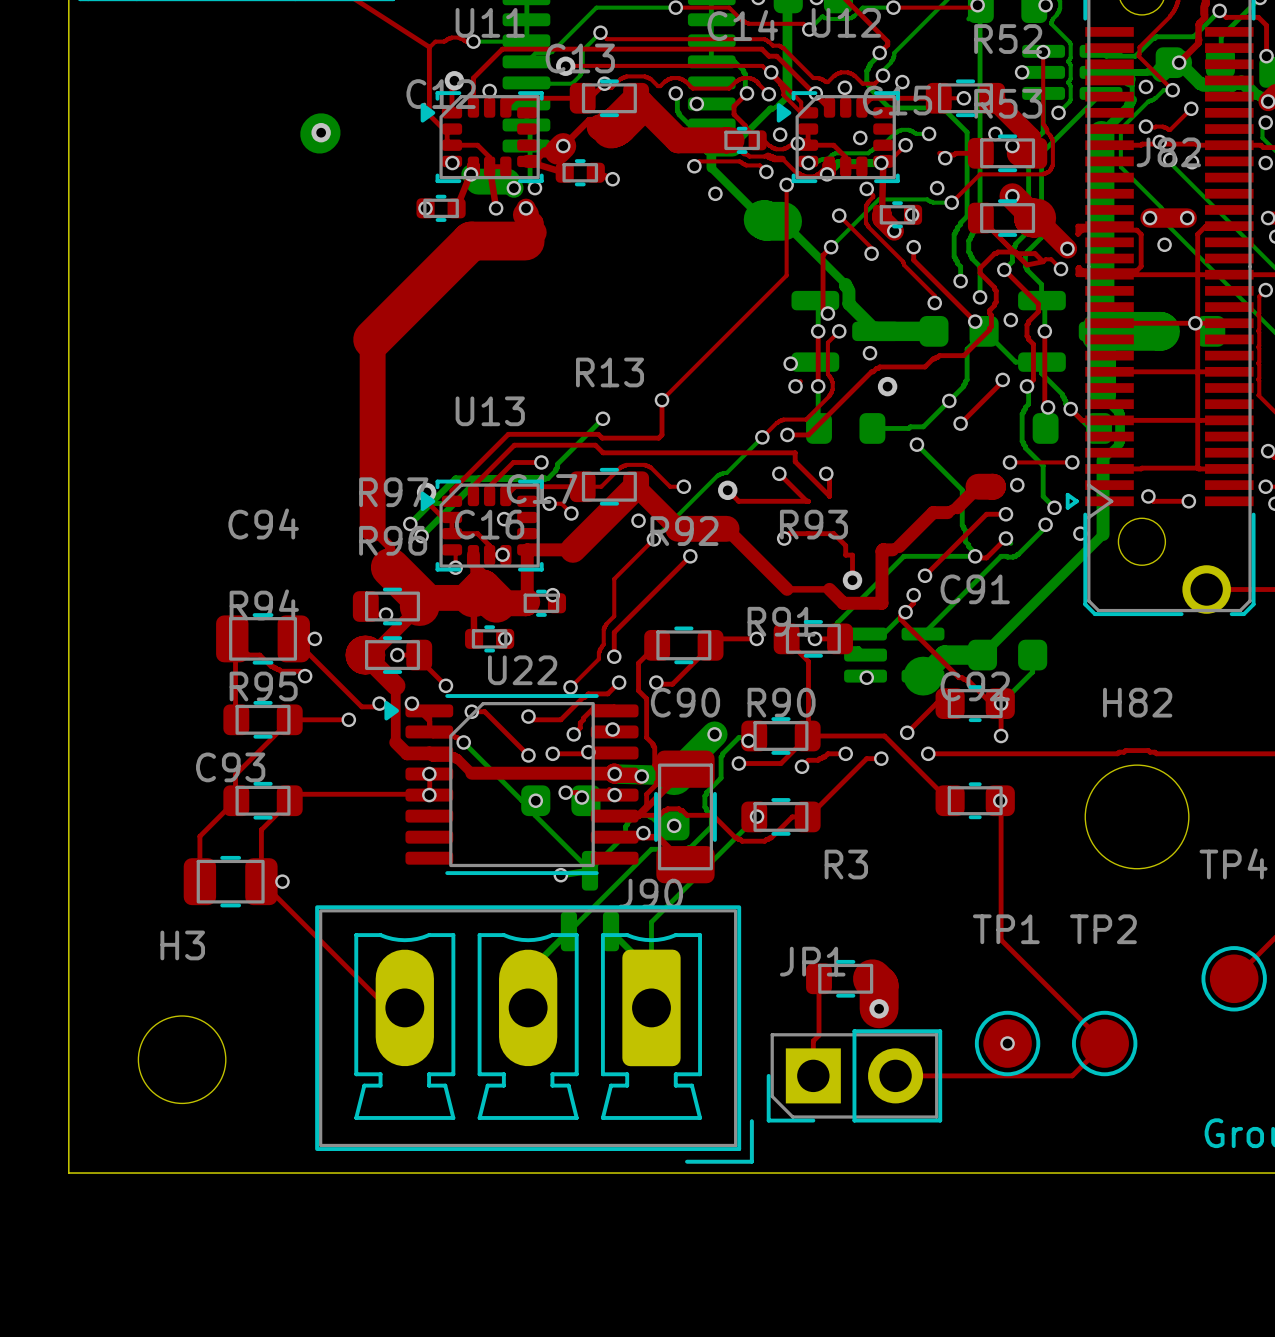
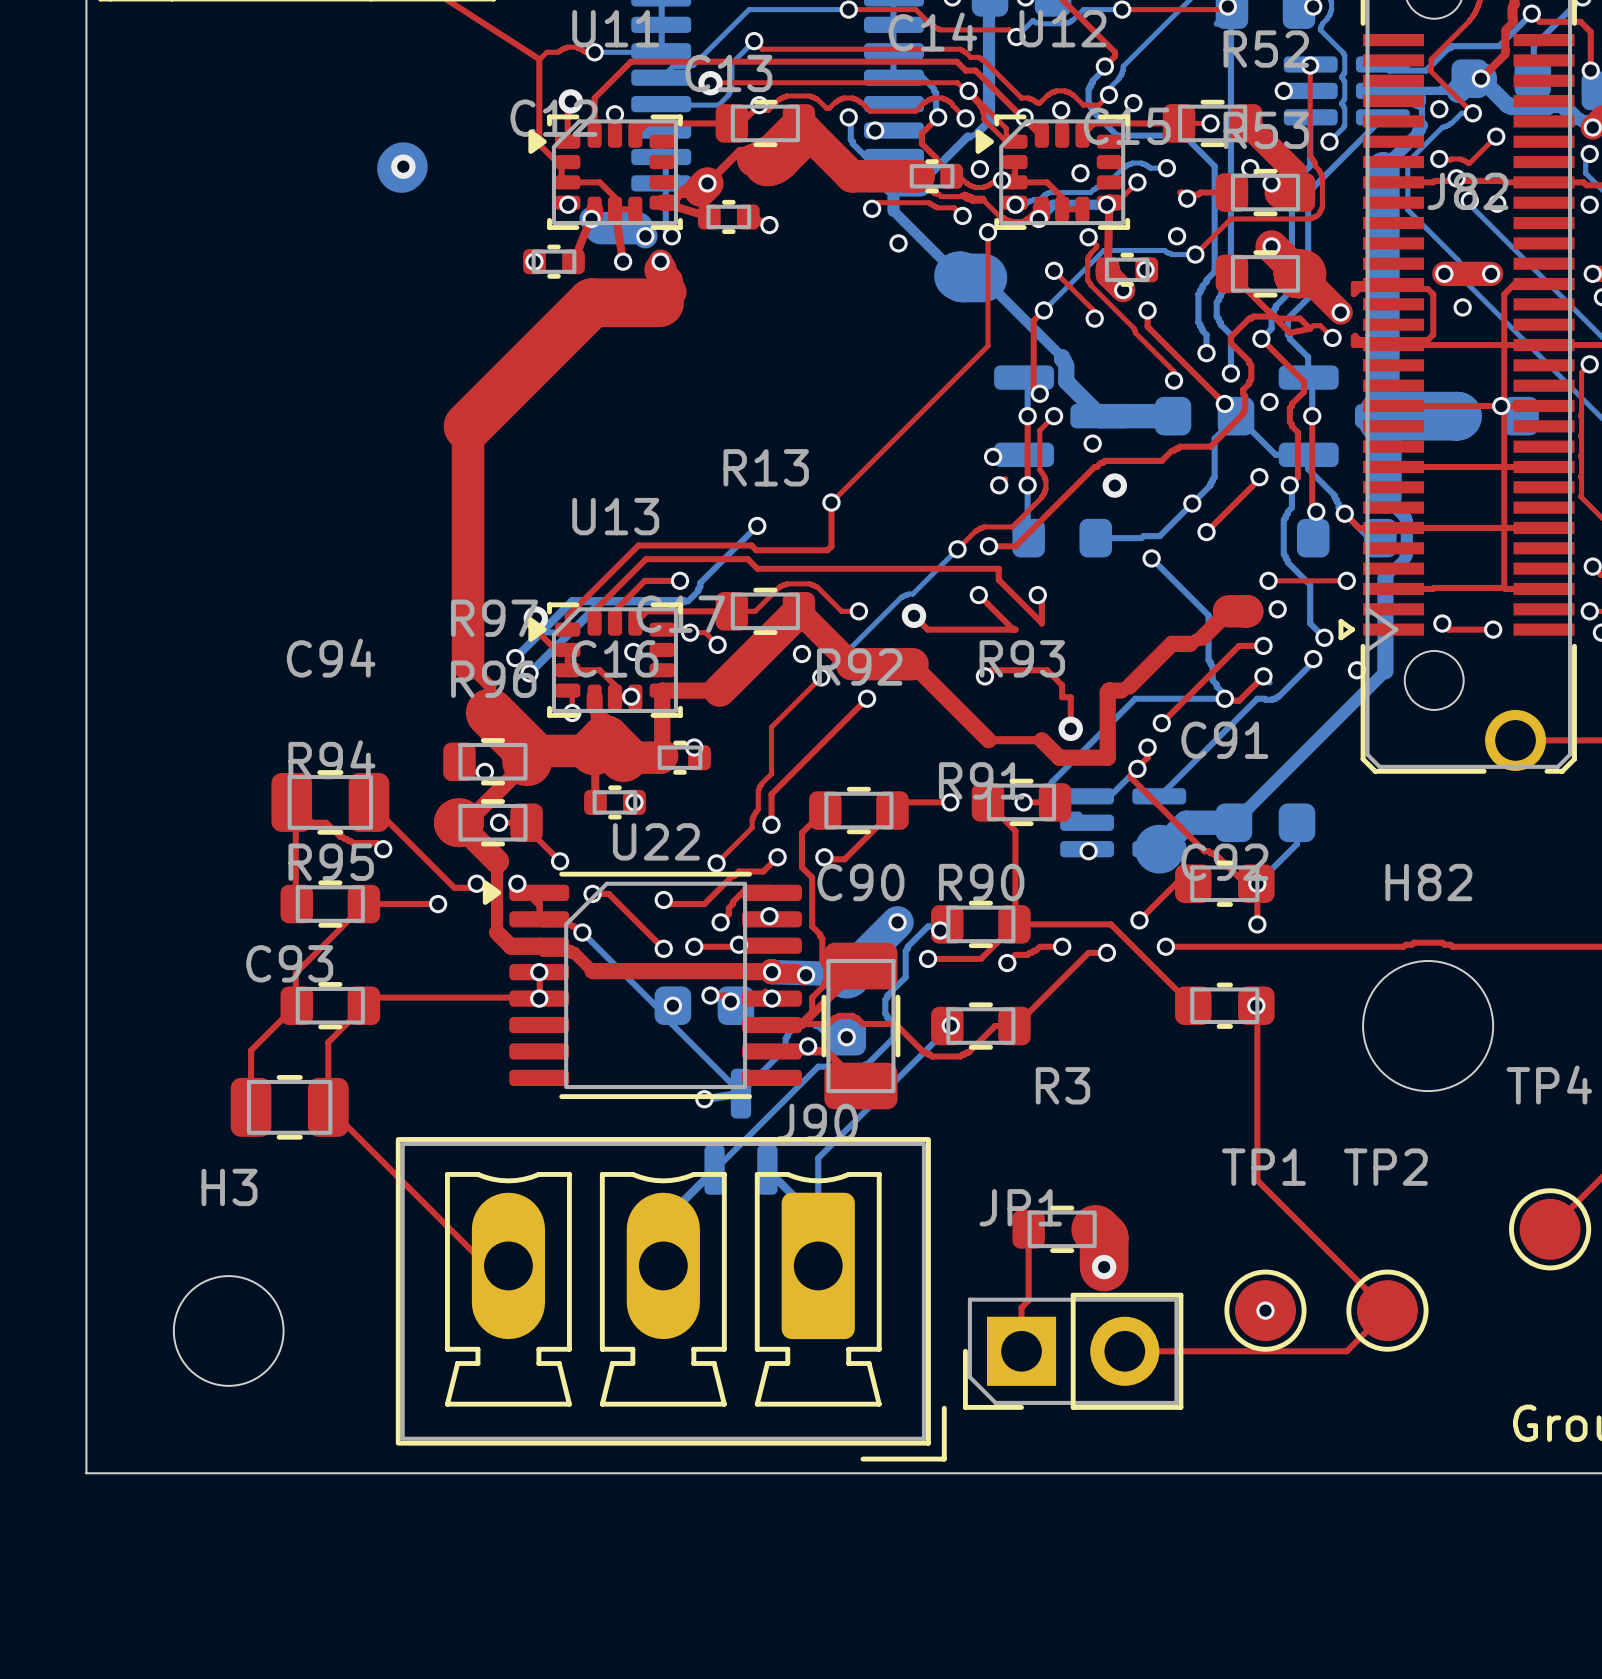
via: (314, 638) -> none
via: (282, 881) -> none

